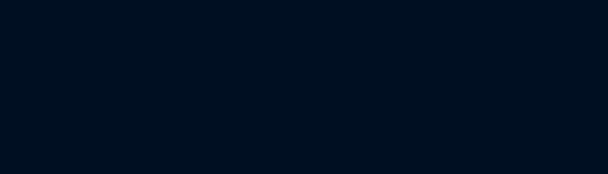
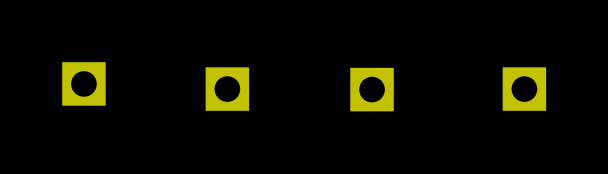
part: none -> (83, 83)
part: none -> (227, 89)
part: none -> (372, 89)
part: none -> (524, 89)

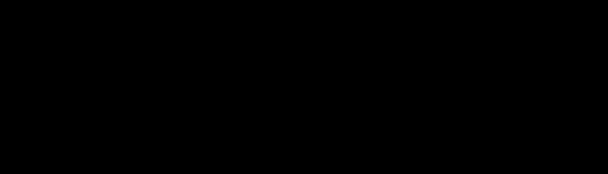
part: (83, 83) -> none
part: (227, 89) -> none
part: (372, 89) -> none
part: (524, 89) -> none

